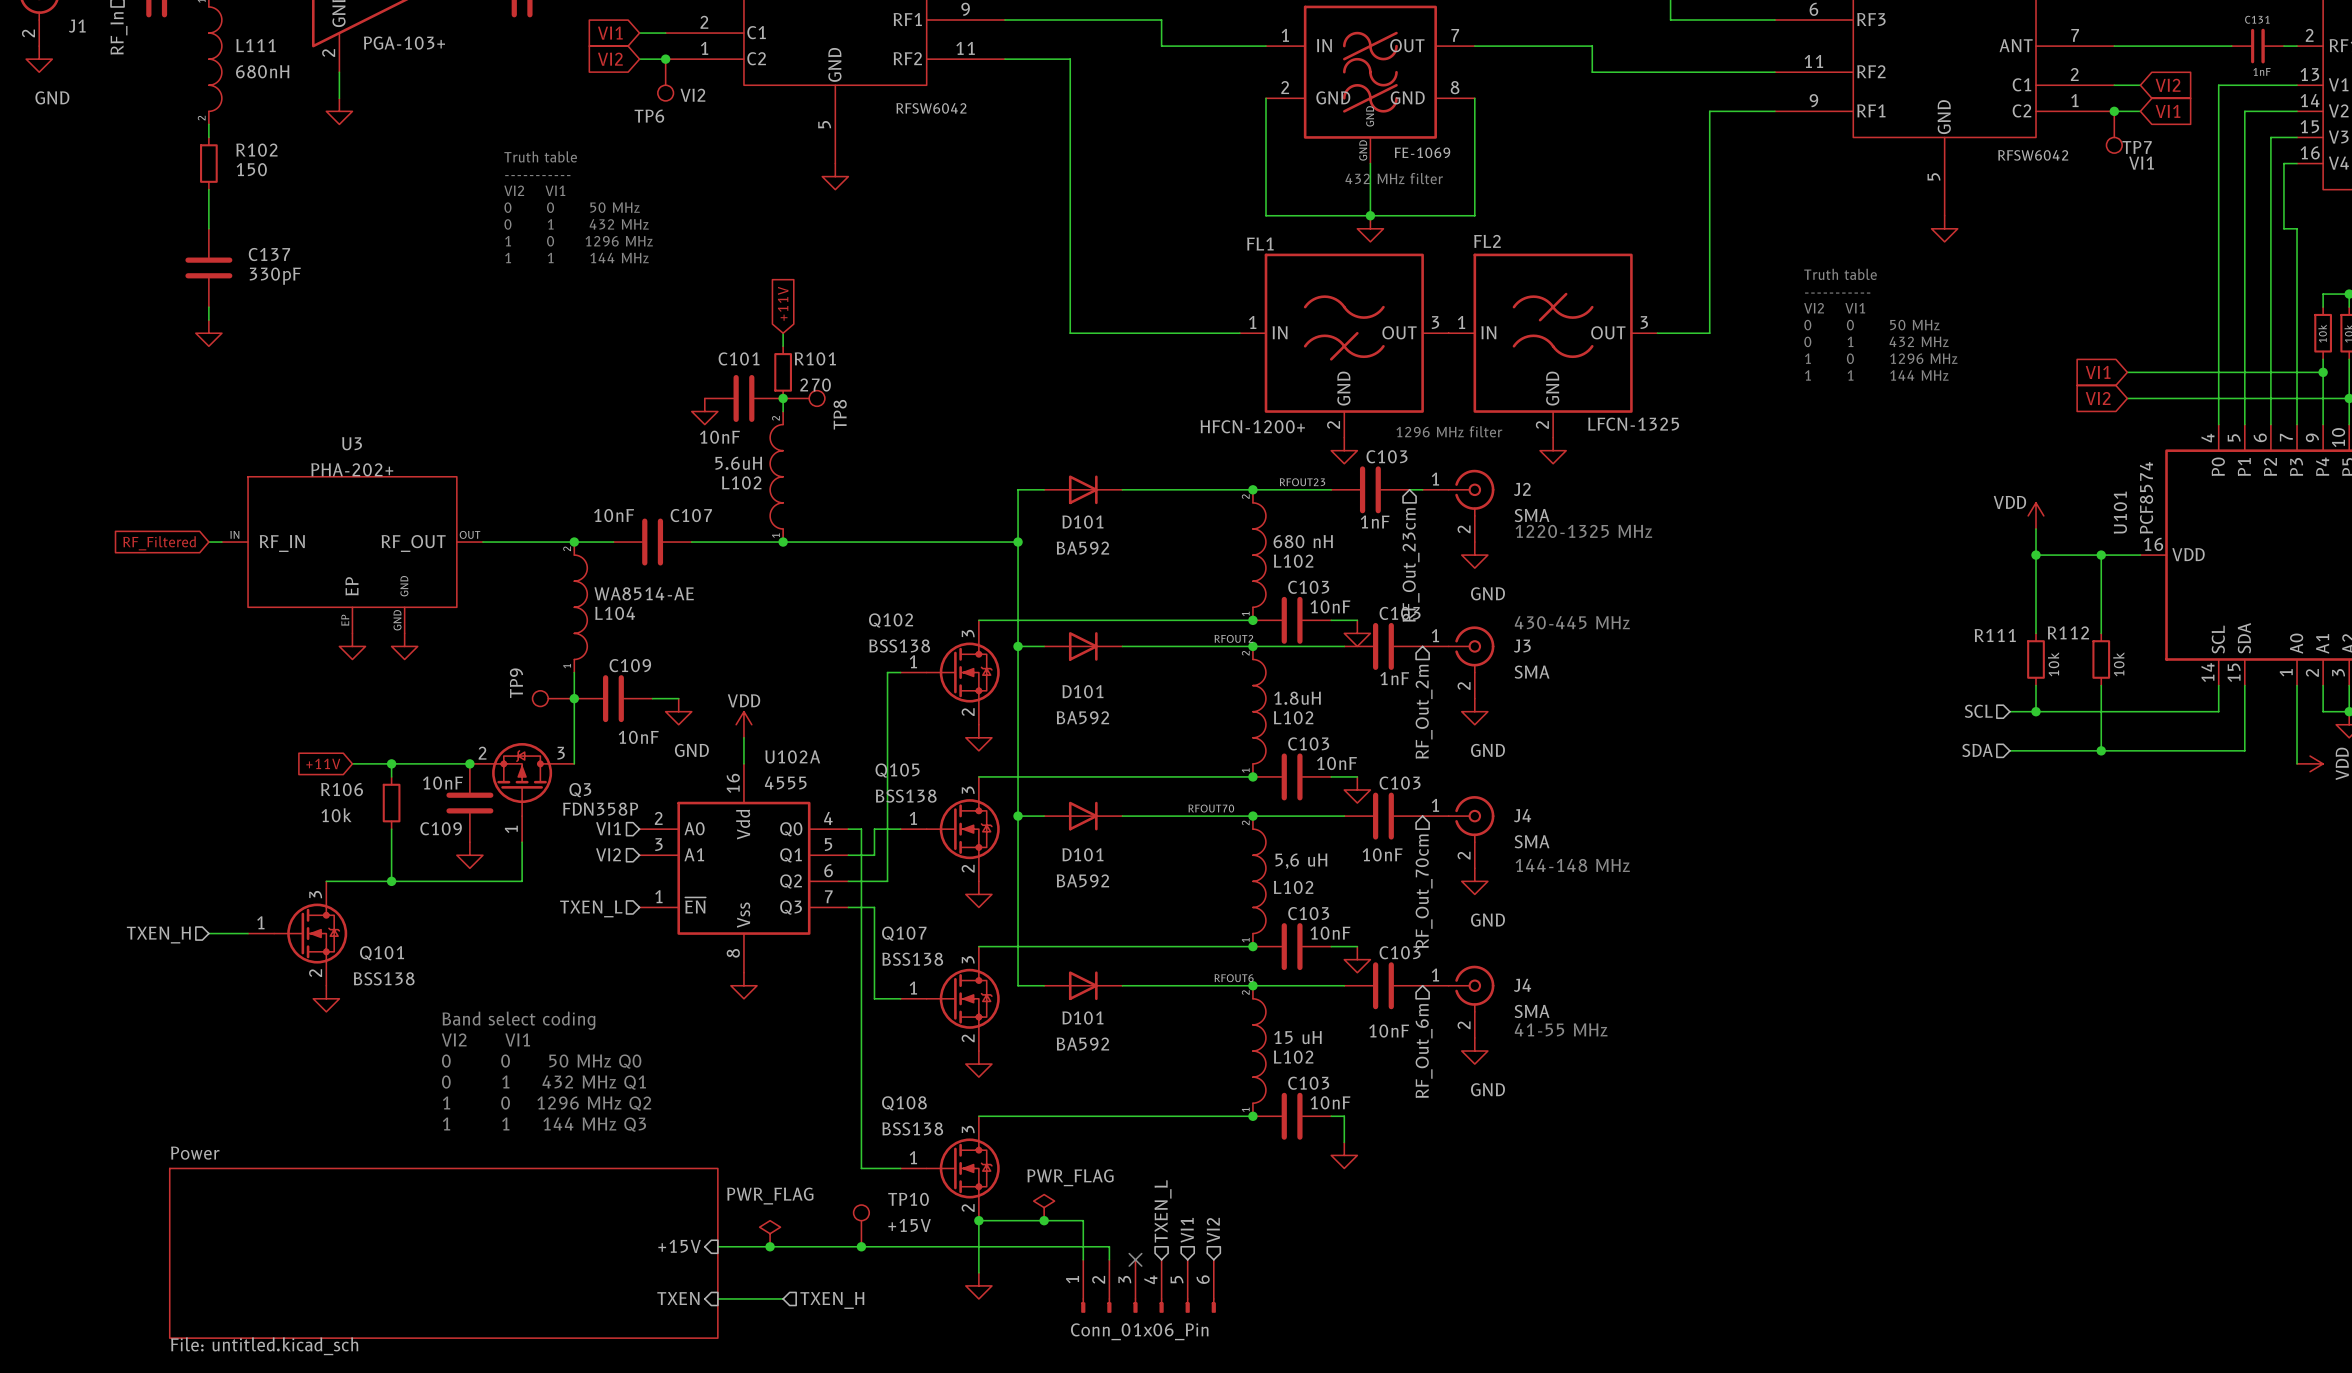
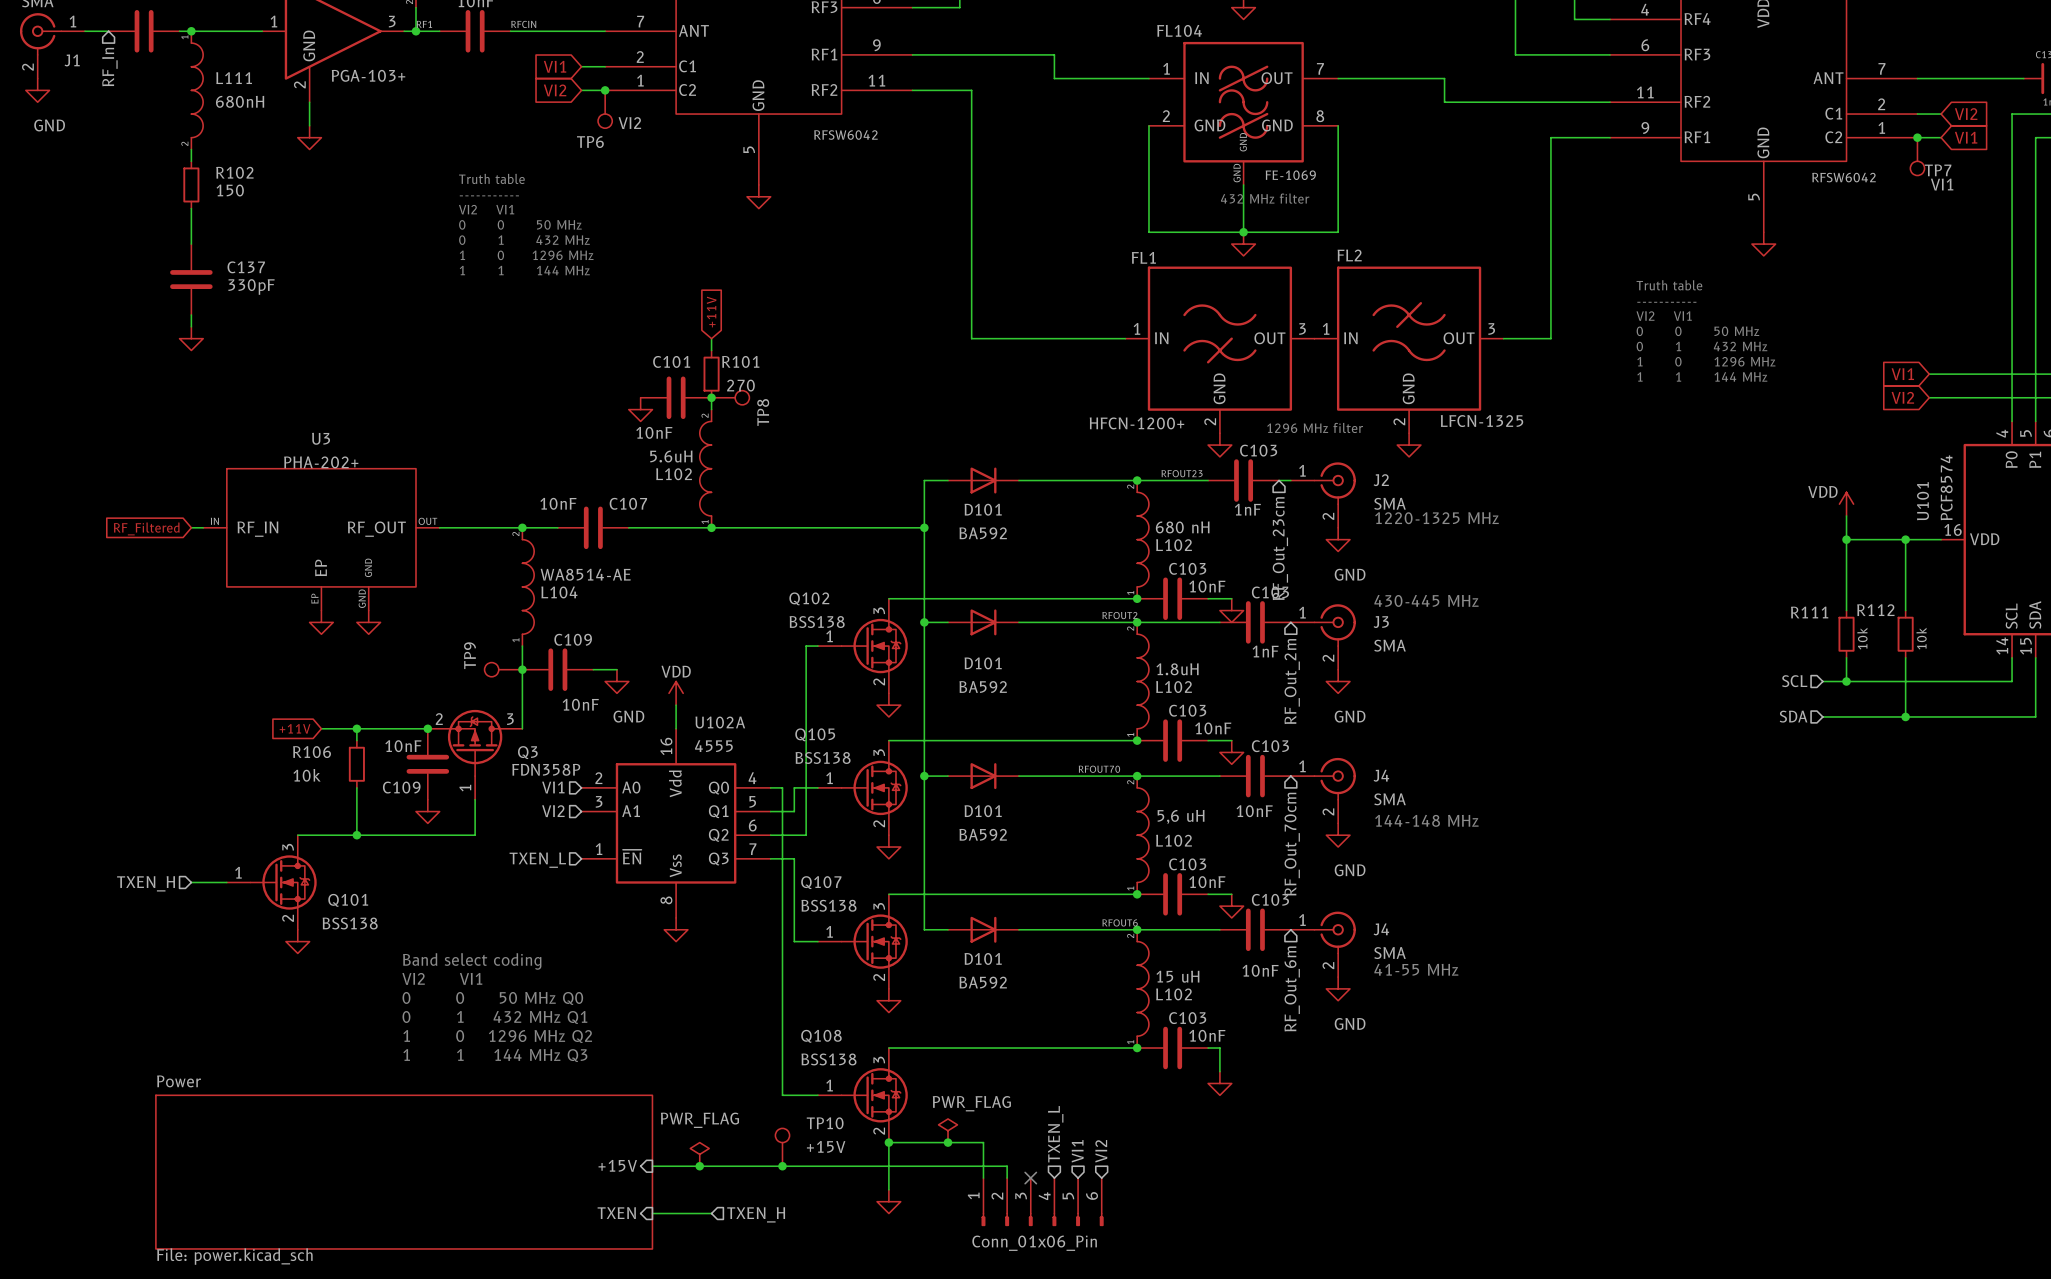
sheet Power value: File: untitled.kicad_sch (264, 1346) -> File: power.kicad_sch (234, 1256)

